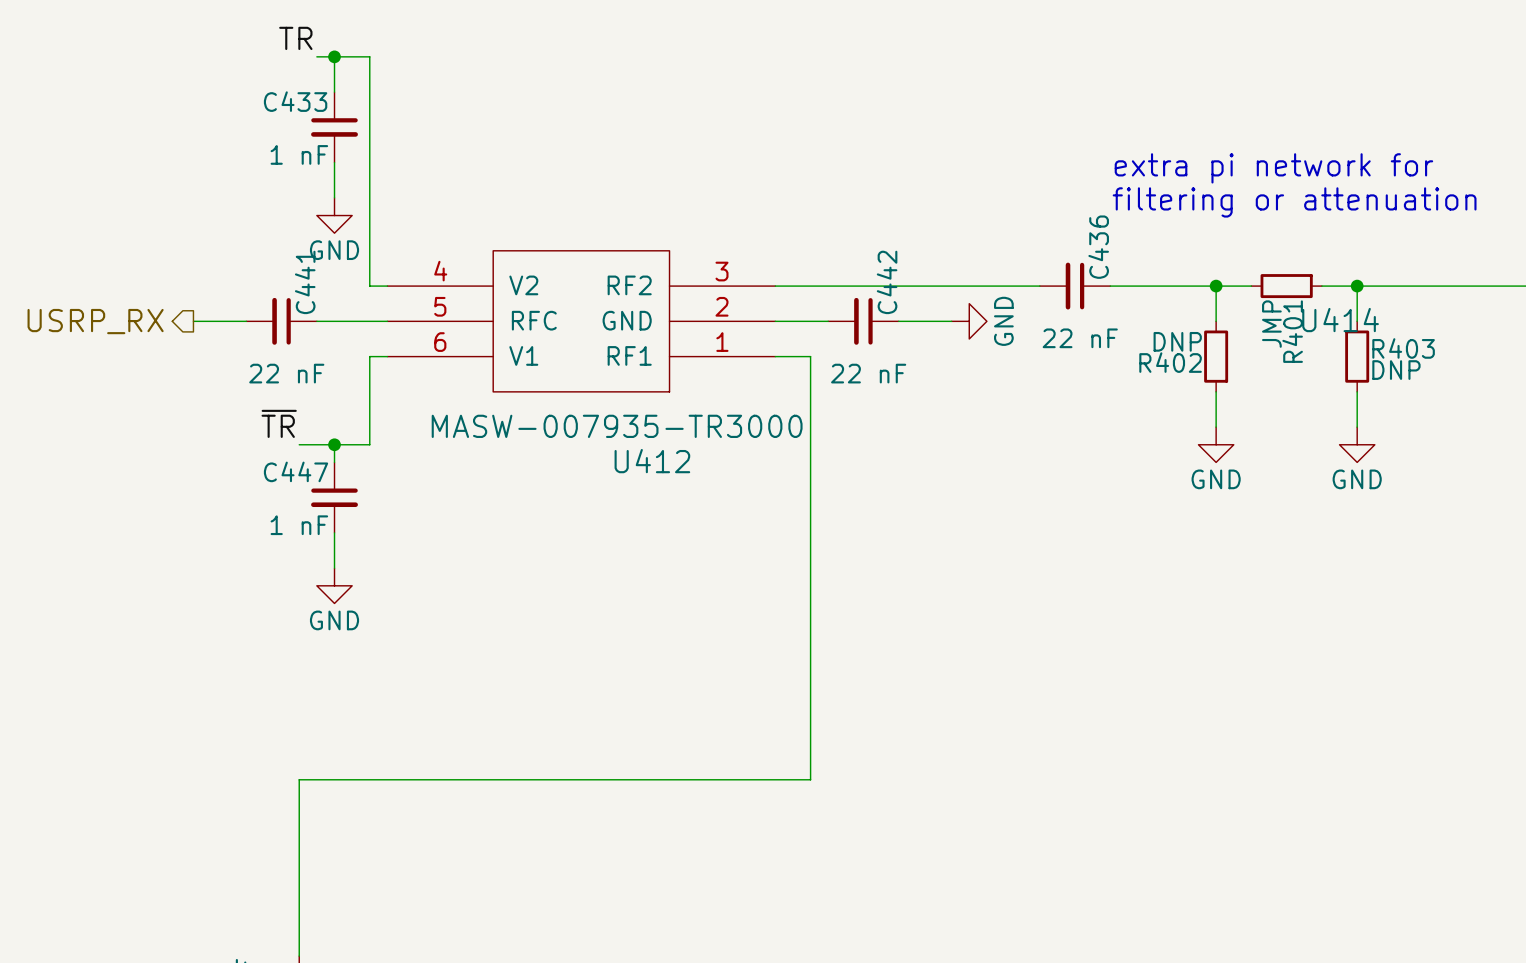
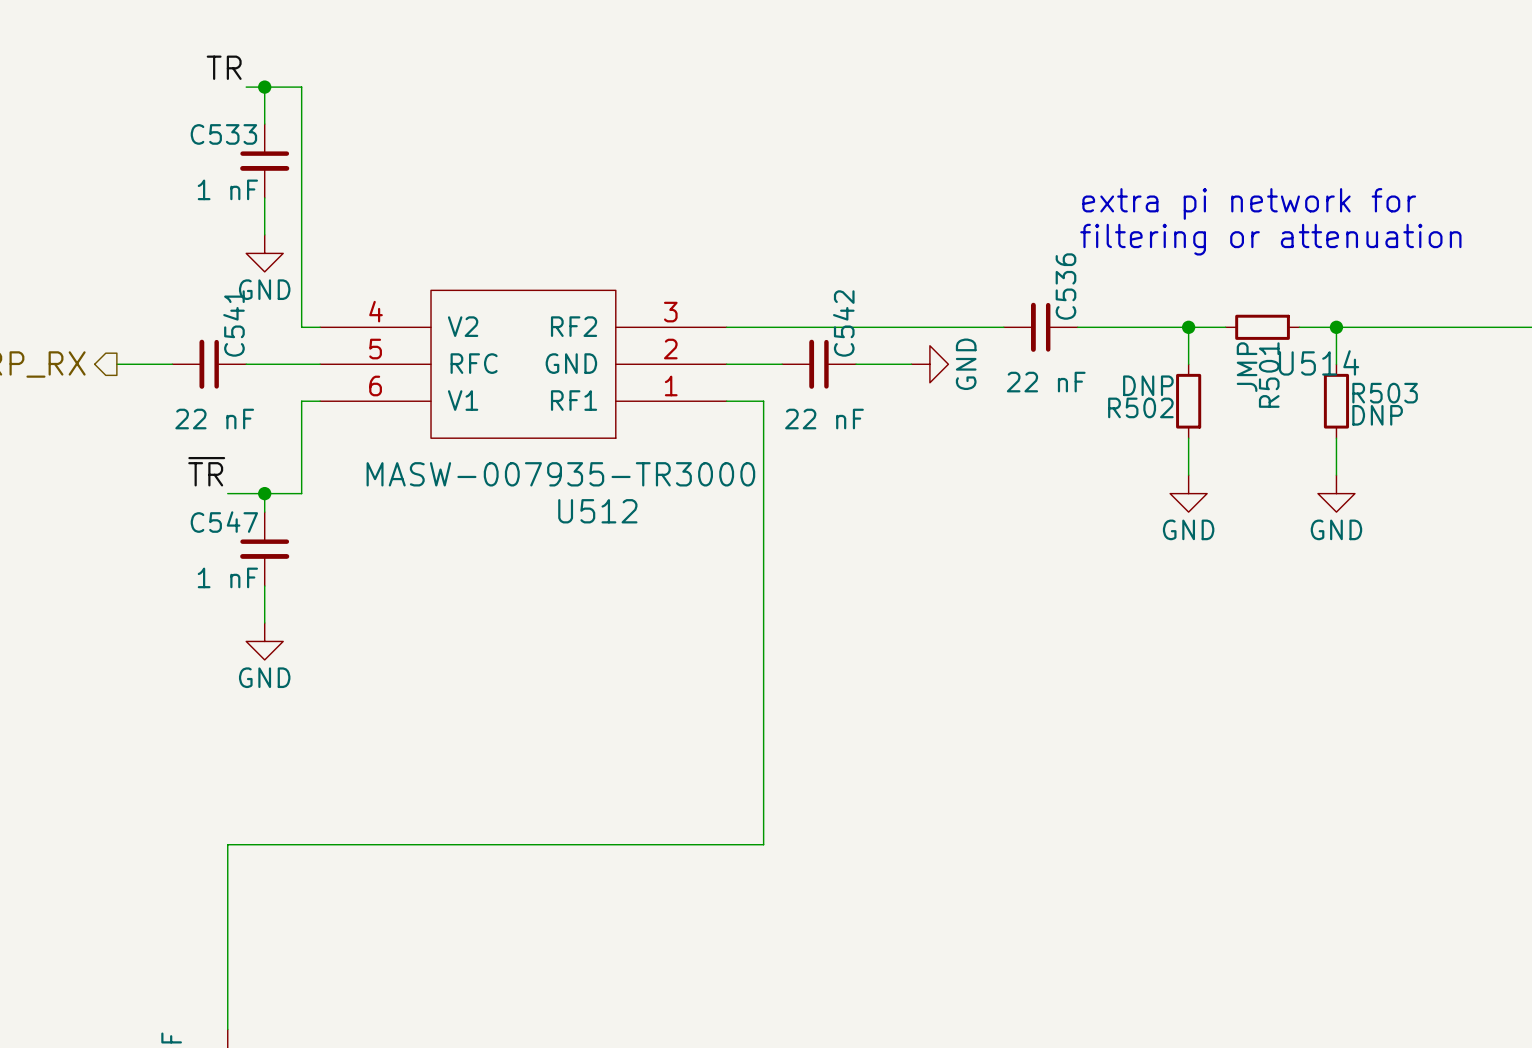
C433 name: C433 (295, 101) -> C533 (223, 134)
C436 name: C436 (1098, 247) -> C536 (1065, 286)
C441 name: C441 (305, 282) -> C541 (234, 323)
C442 name: C442 (887, 282) -> C542 (843, 323)
U414 name: U414 (1340, 320) -> U514 (1319, 362)
R401 name: R401 (1292, 331) -> R501 (1269, 375)
R403 name: R403 (1403, 348) -> R503 (1385, 393)
R402 name: R402 (1170, 362) -> R502 (1140, 407)
U412 name: U412 (652, 461) -> U512 (597, 511)
C447 name: C447 (296, 471) -> C547 (224, 522)

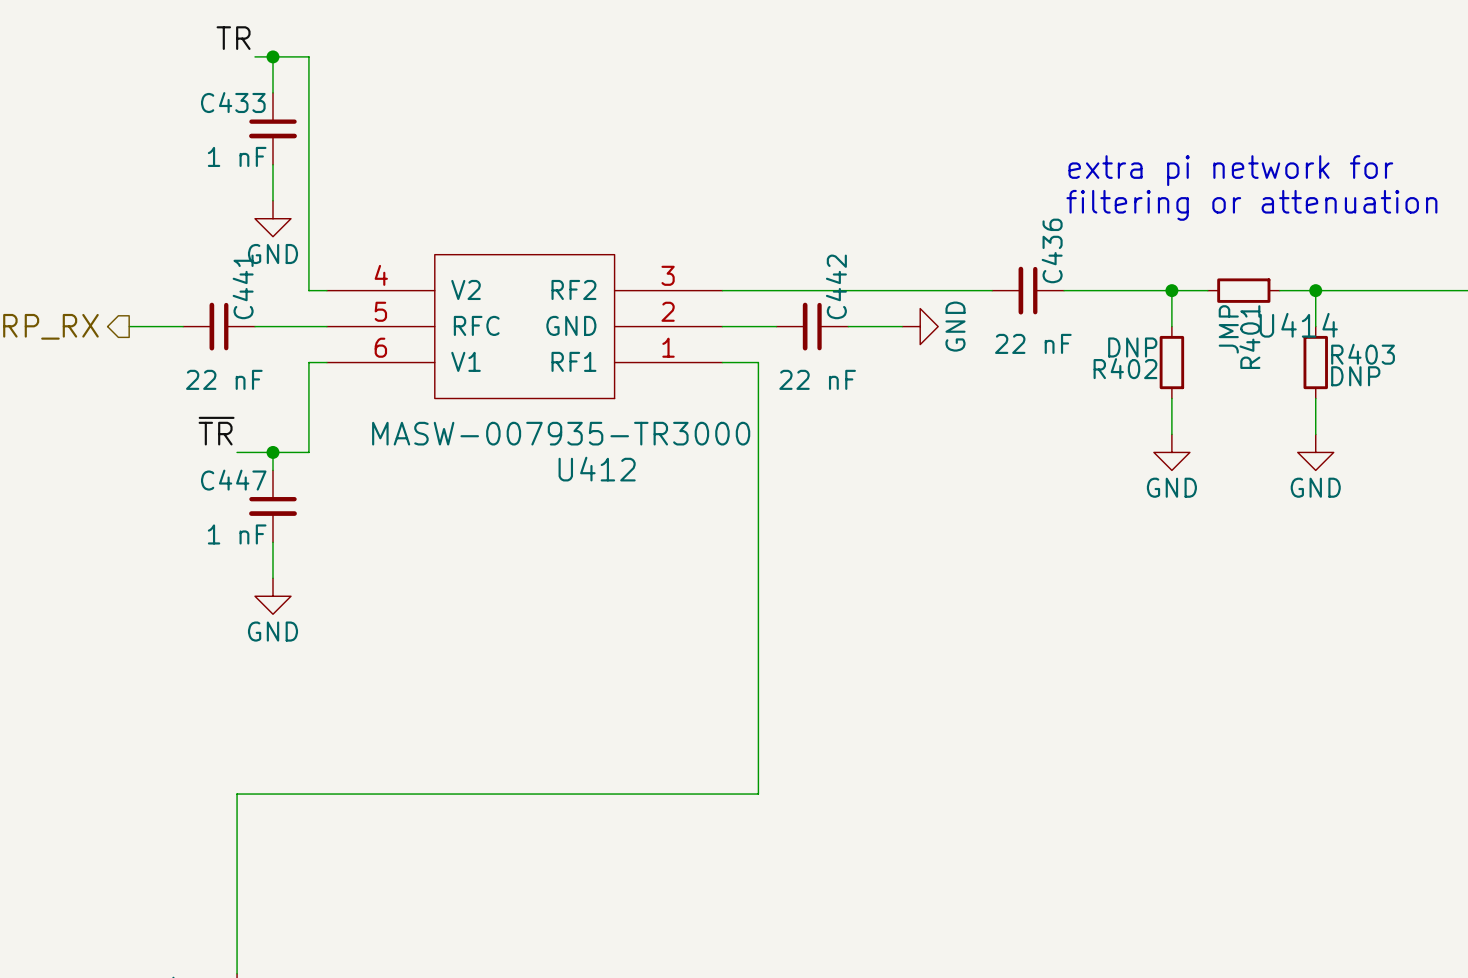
C533 name: C533 (223, 134) -> C433 (233, 102)
C536 name: C536 (1065, 286) -> C436 (1052, 250)
C541 name: C541 (234, 323) -> C441 (243, 286)
C542 name: C542 (843, 323) -> C442 (836, 286)
U514 name: U514 (1319, 362) -> U414 (1298, 325)
R501 name: R501 (1269, 375) -> R401 (1249, 337)
R503 name: R503 (1385, 393) -> R403 (1363, 354)
R502 name: R502 (1140, 407) -> R402 (1125, 368)
U512 name: U512 (597, 511) -> U412 (597, 469)
C547 name: C547 (224, 522) -> C447 (233, 480)

